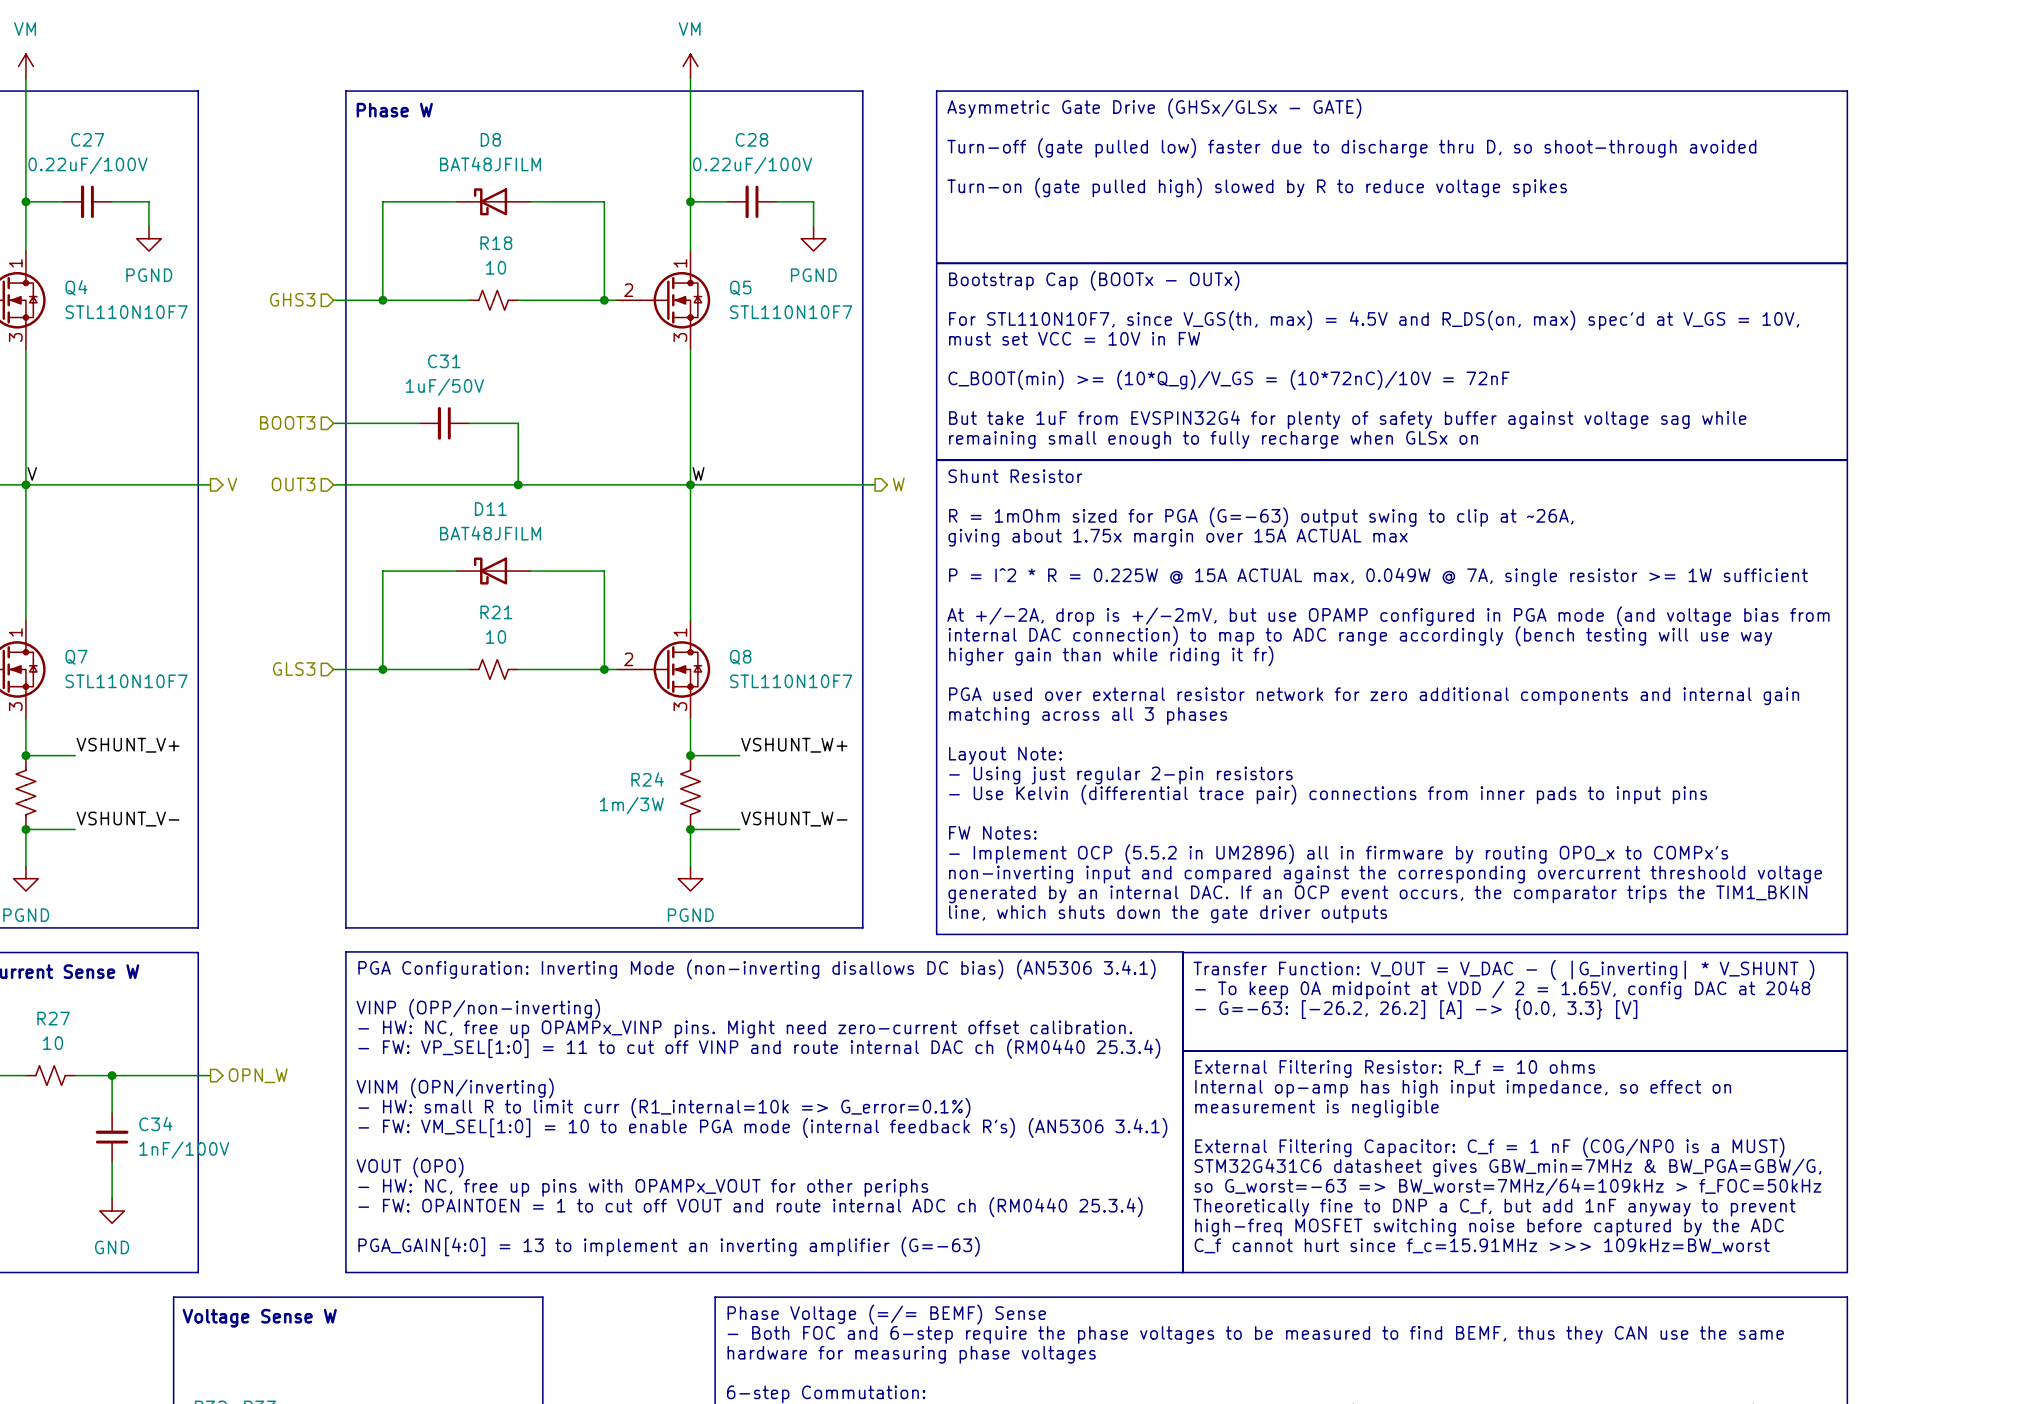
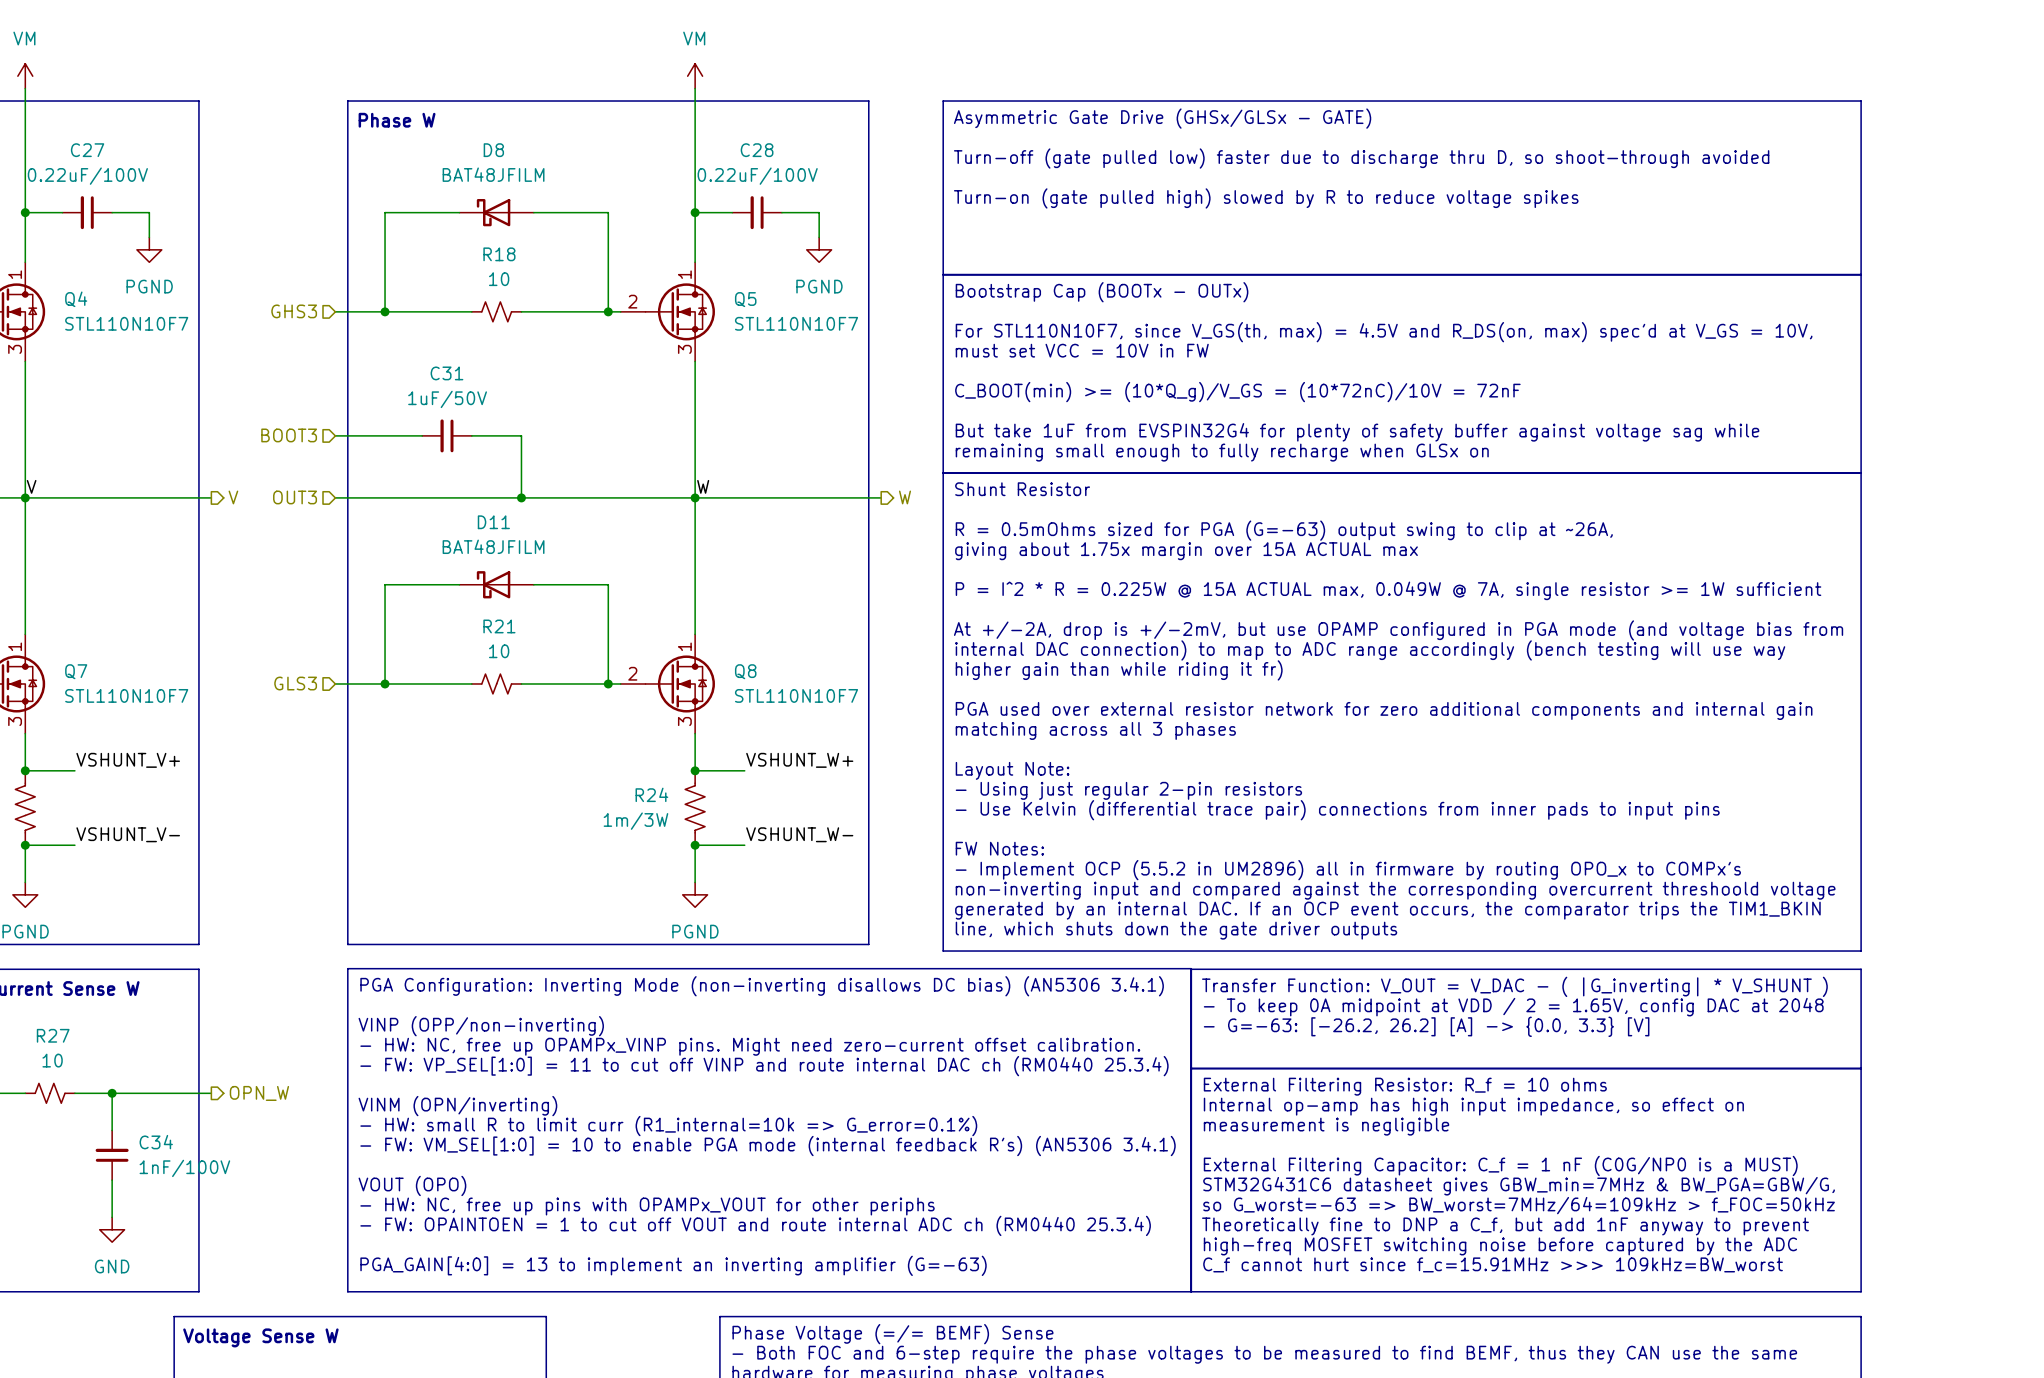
text: R = 1mOhm sized for PGA (G=-63) output swing to clip at ~26A, (1261, 517) -> R = 0.5mOhms sized for PGA (G=-63) output swing to clip at ~26A, (1284, 530)

